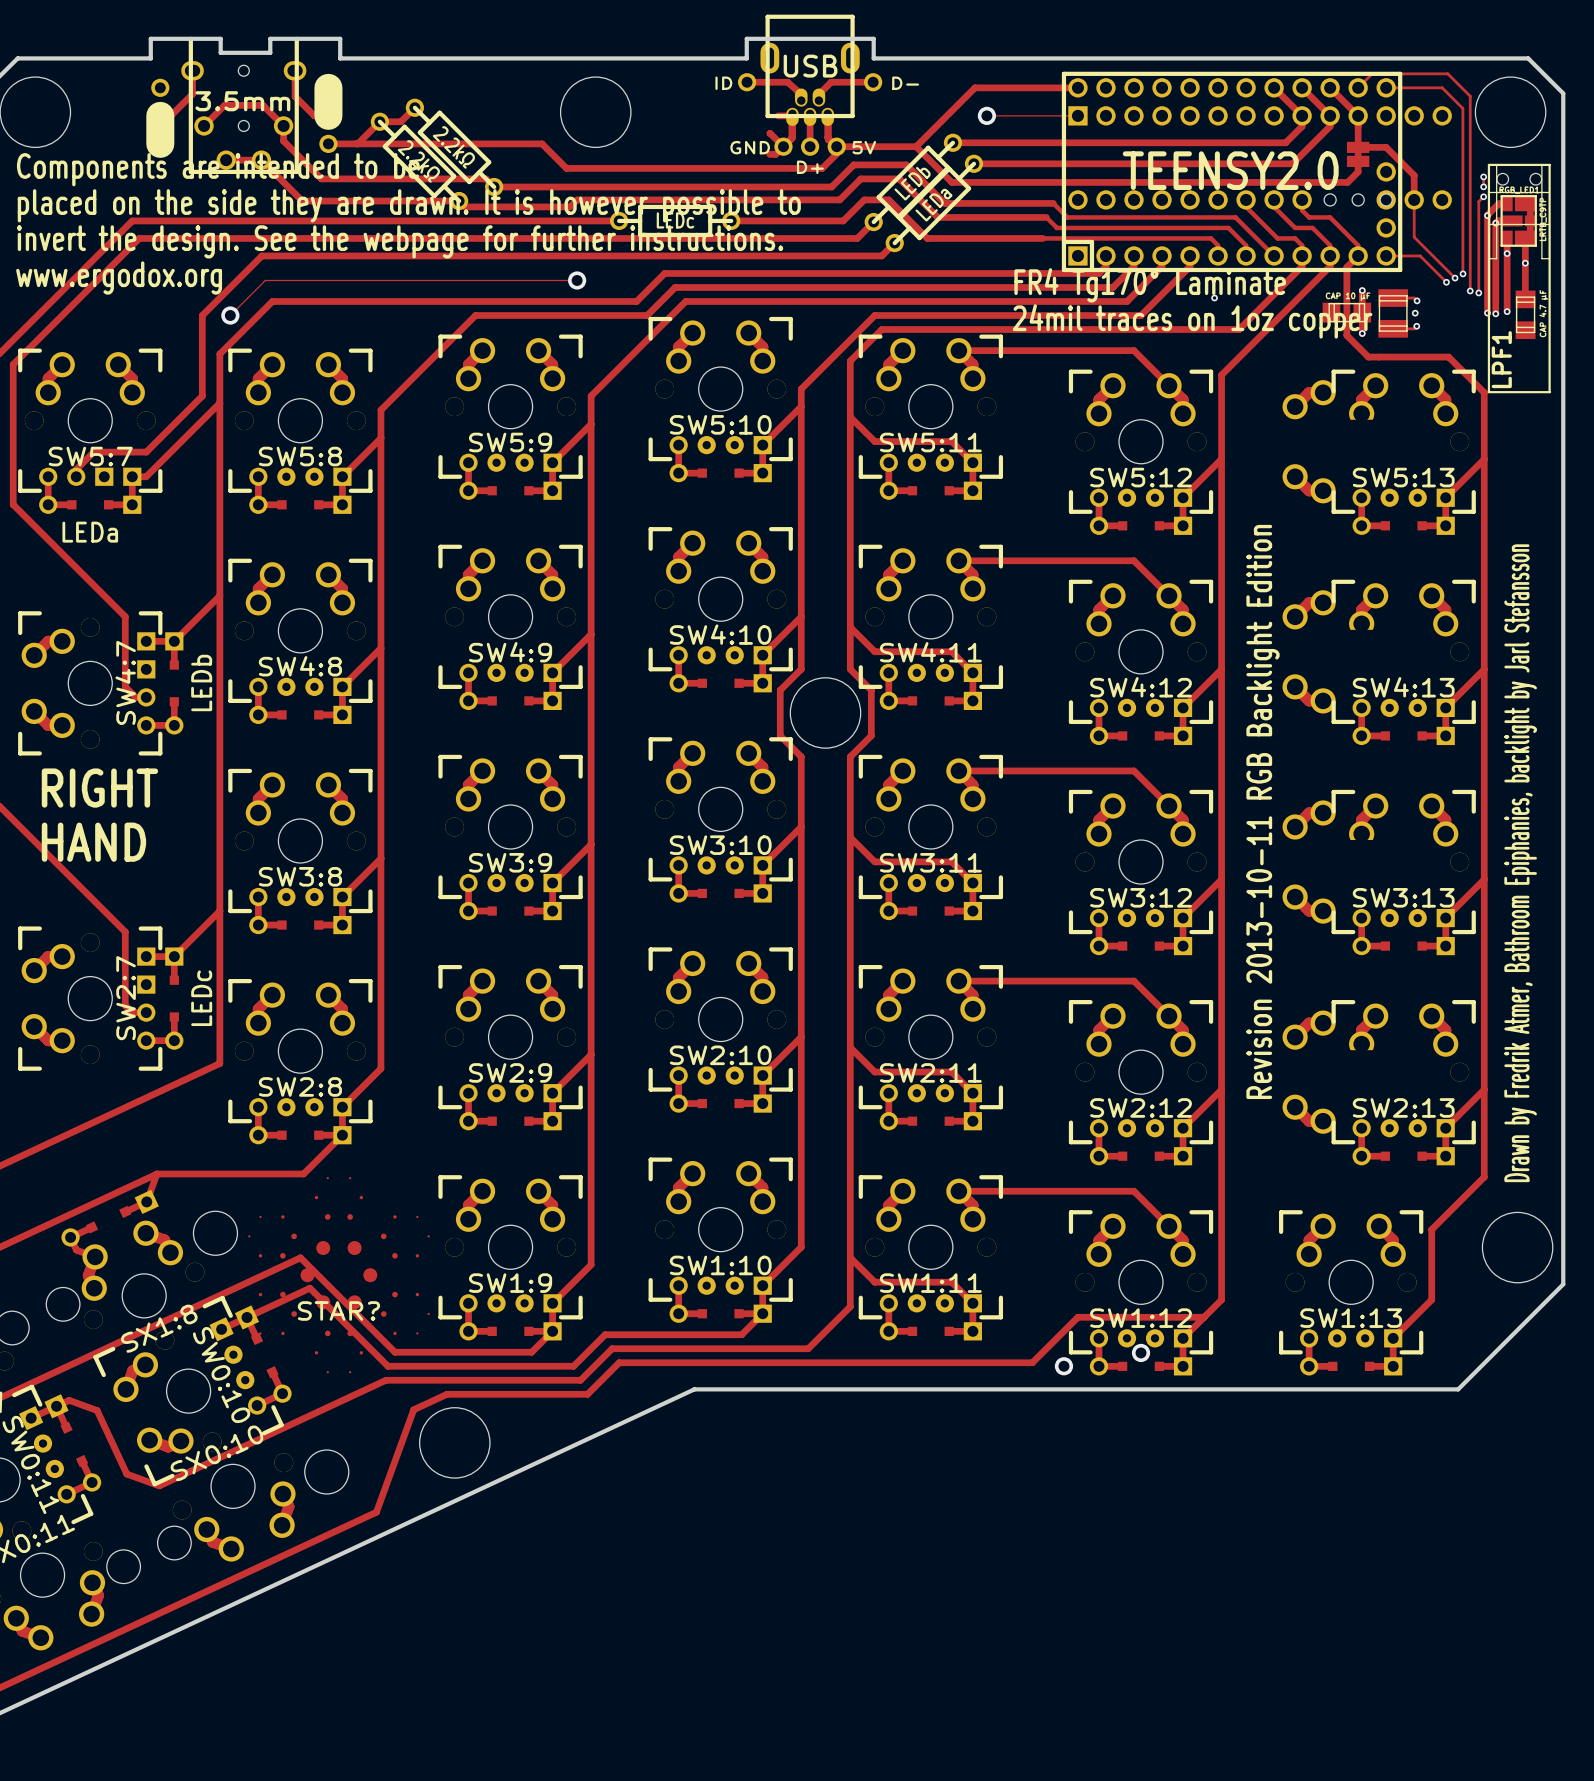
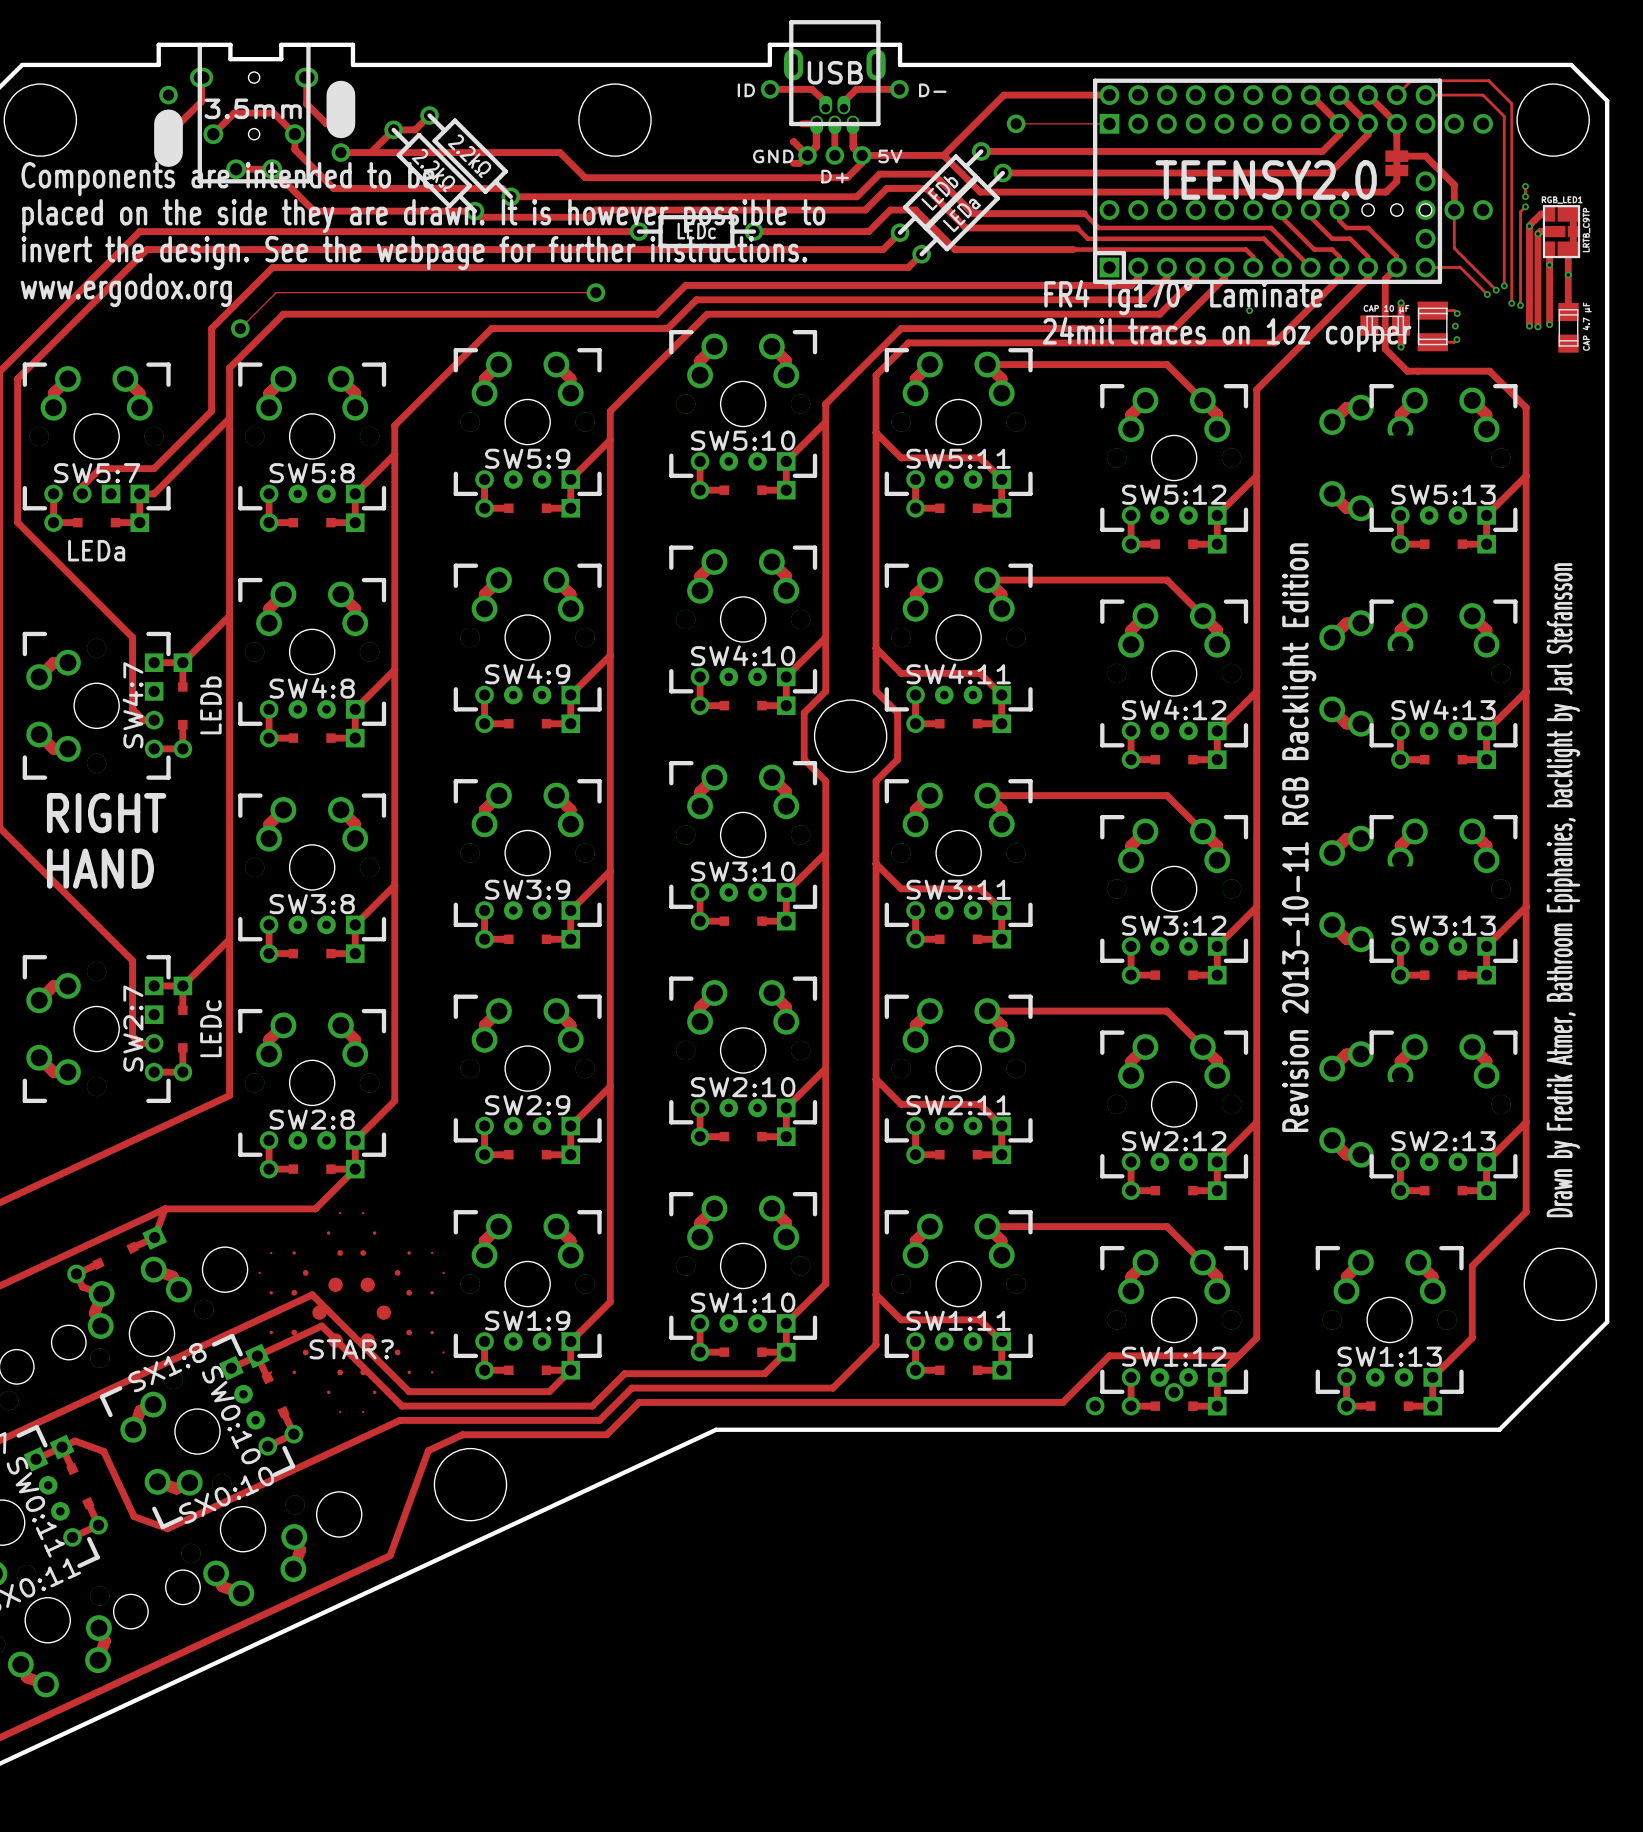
part: LPF1 (1519, 278) -> none

